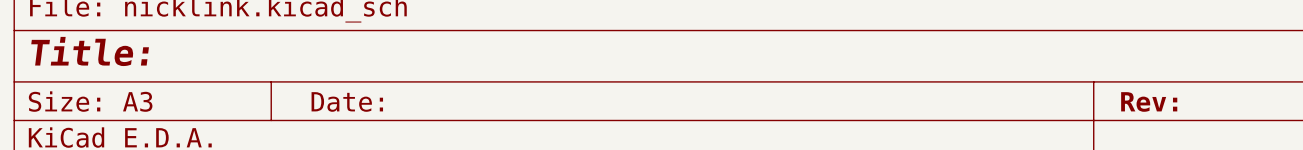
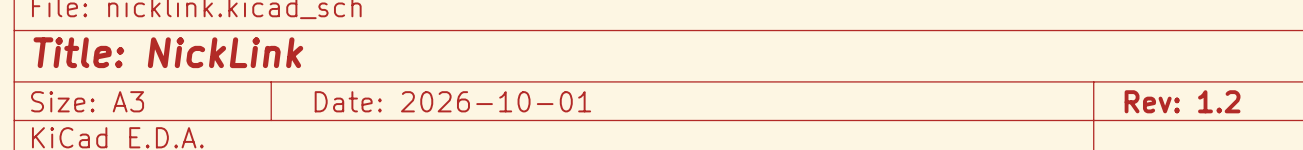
title block: Title: (90, 51) -> Title: NickLink (168, 52)
title block: Date: (347, 101) -> Date: 2026-10-01 (452, 101)
title block: Rev: (1149, 101) -> Rev: 1.2 (1182, 101)

